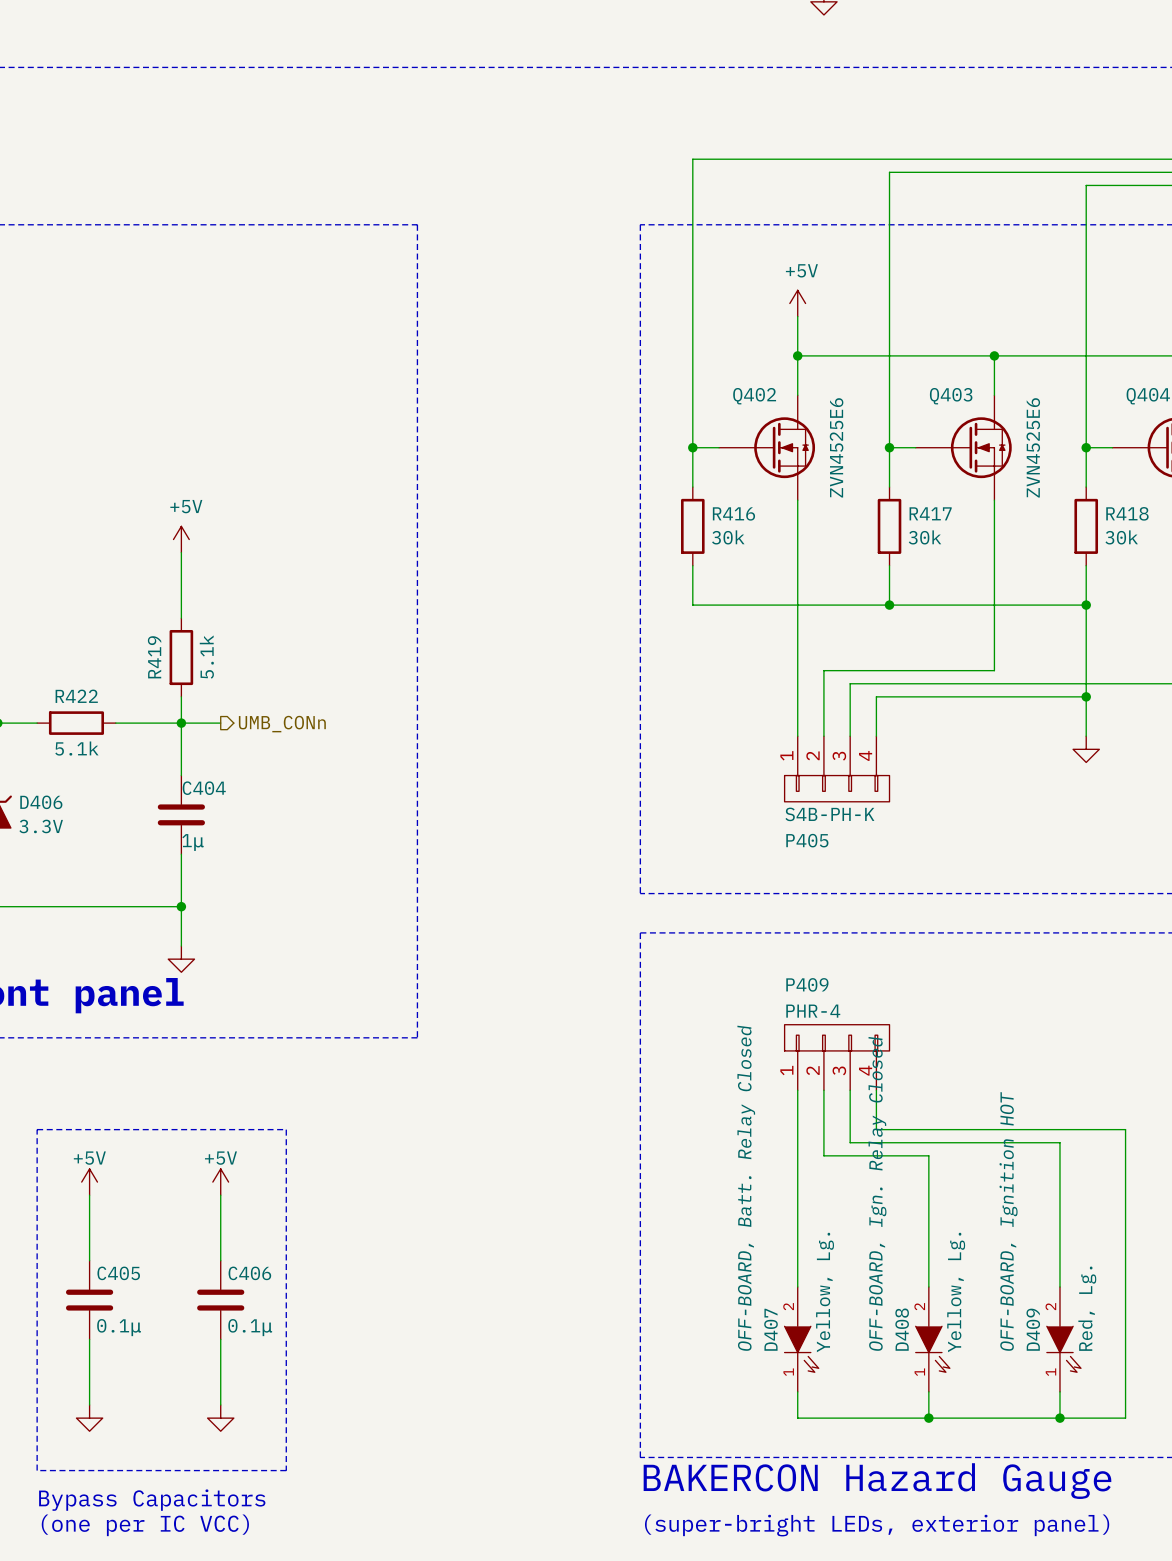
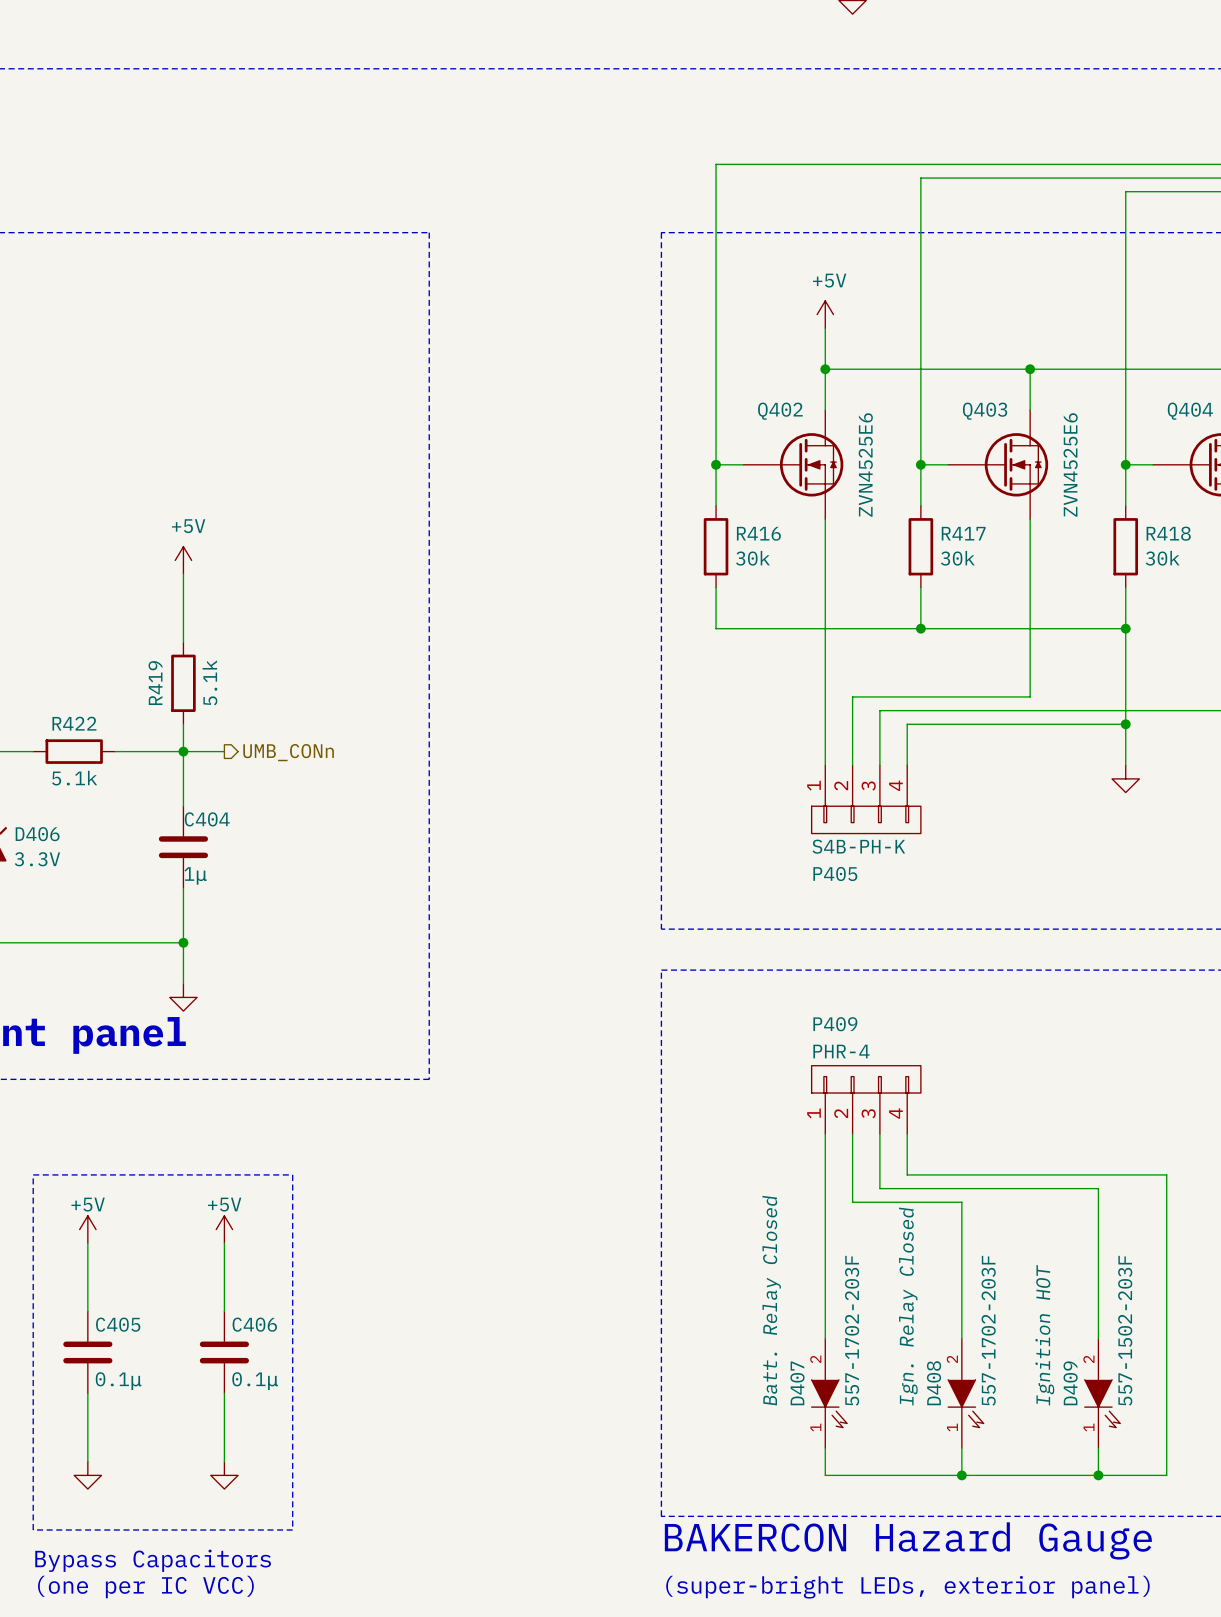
D407 text: OFF-BOARD, Batt. Relay Closed (746, 1188) -> Batt. Relay Closed (771, 1300)
D408 text: OFF-BOARD, Ign. Relay Closed (877, 1193) -> Ign. Relay Closed (908, 1306)
D409 text: OFF-BOARD, Ignition HOT (1008, 1221) -> Ignition HOT (1044, 1335)
D407 value: Yellow, Lg. (825, 1292) -> 557-1702-203F (852, 1330)
D408 value: Yellow, Lg. (956, 1292) -> 557-1702-203F (988, 1330)
D409 value: Red, Lg. (1087, 1308) -> 557-1502-203F (1125, 1330)

